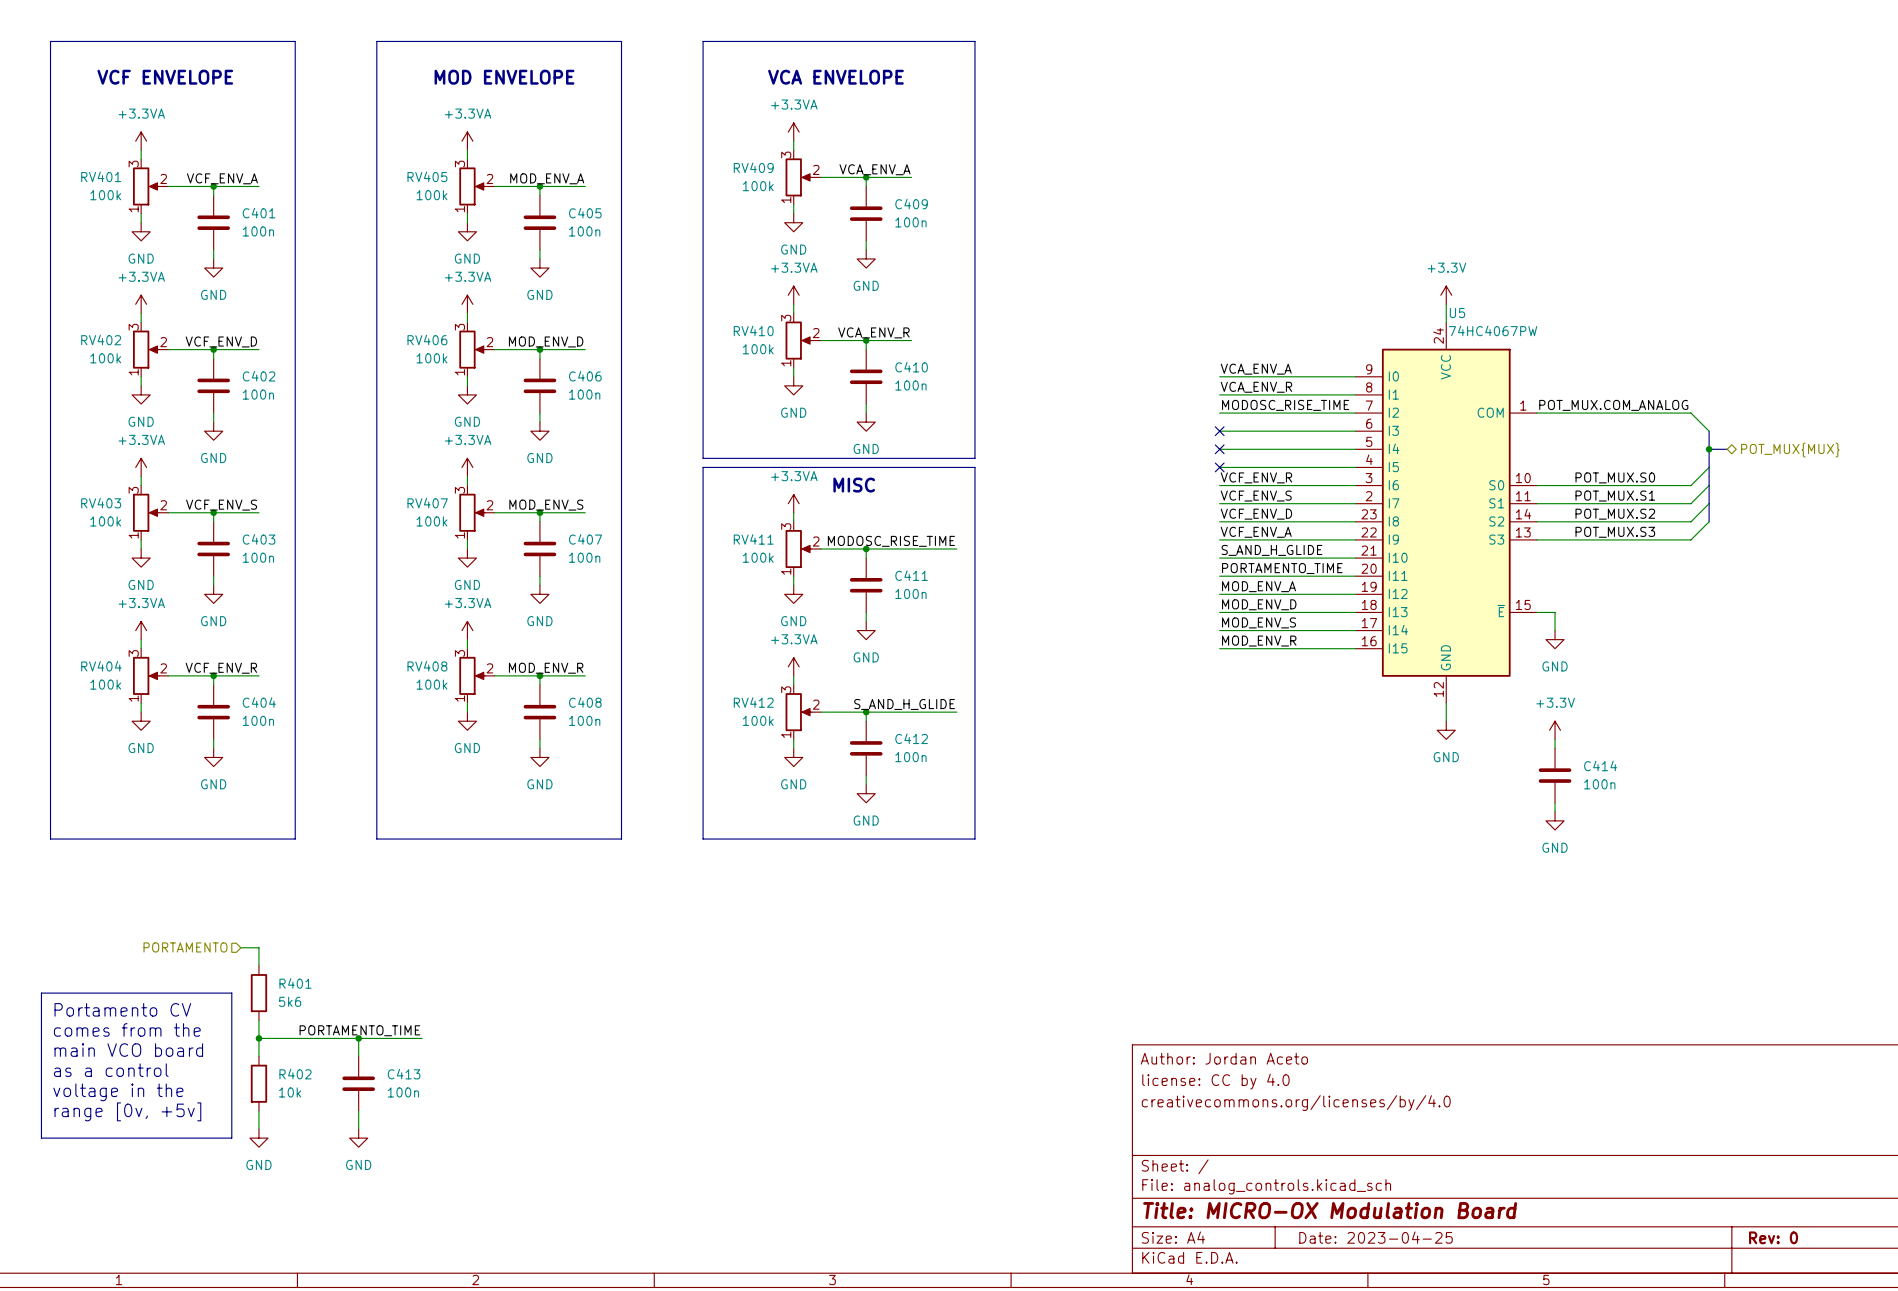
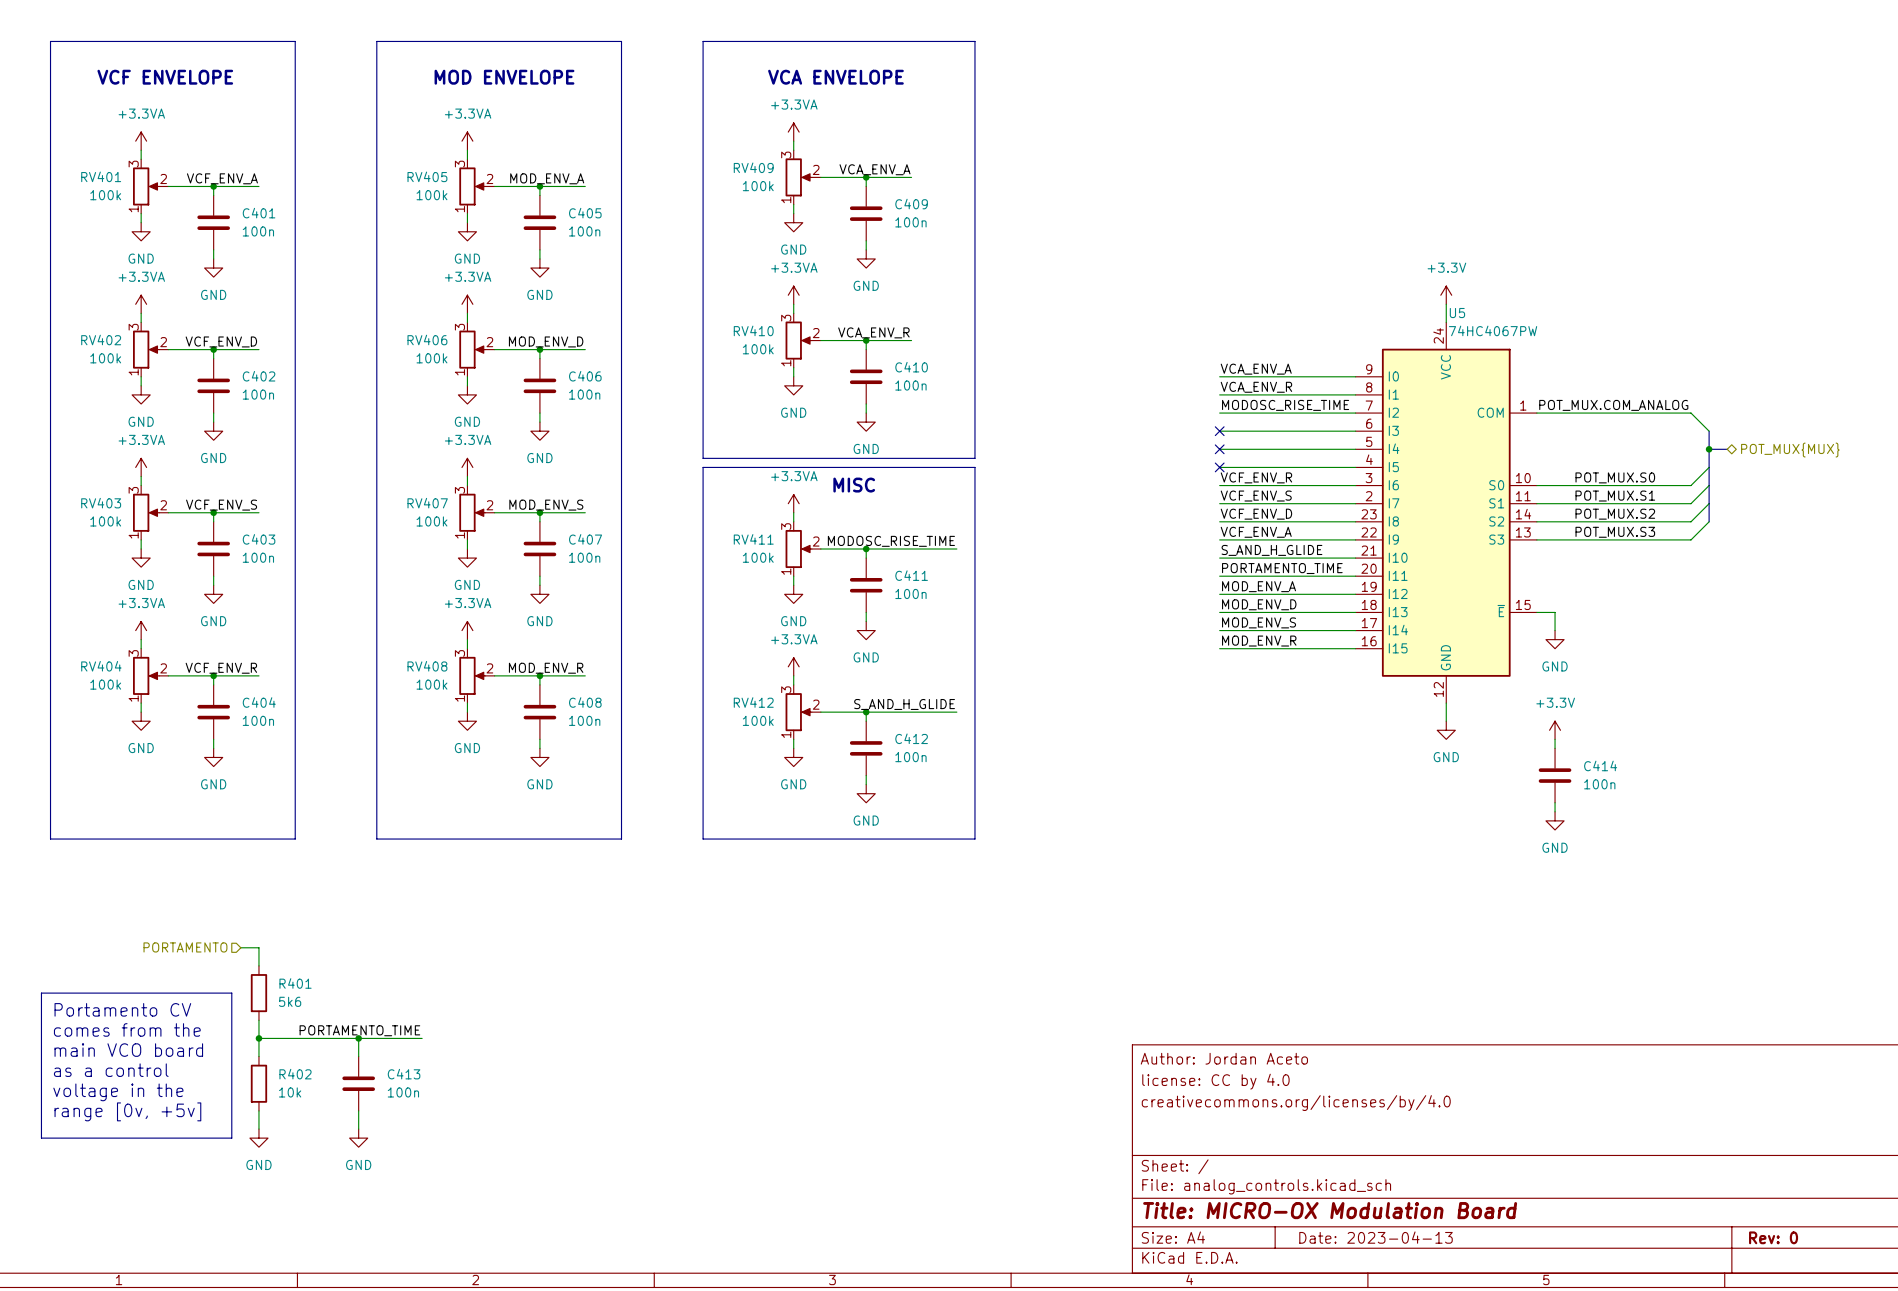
title block: Date: 2023-04-25 (1376, 1237) -> Date: 2023-04-13 (1376, 1237)

